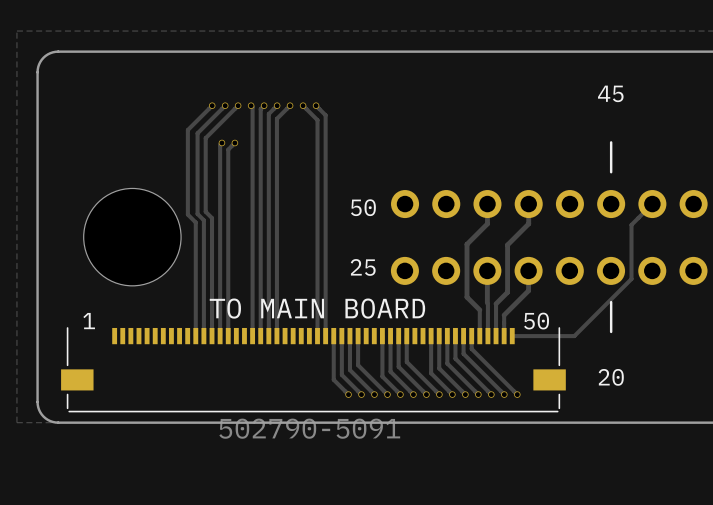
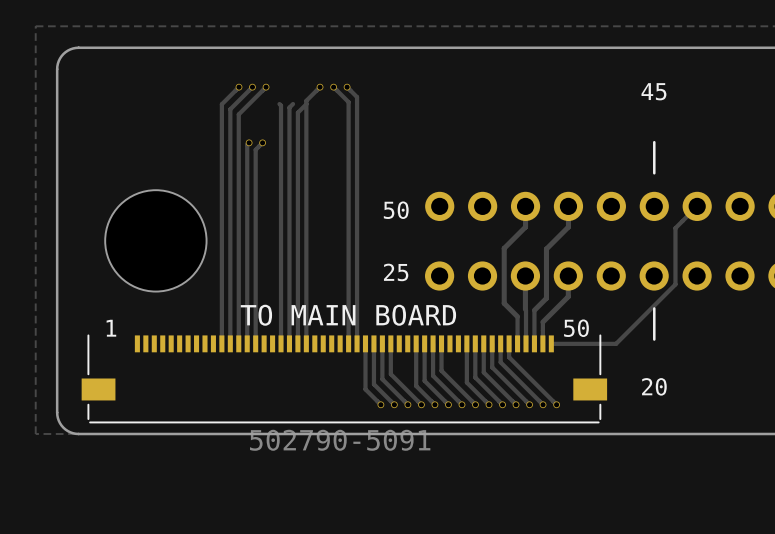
via: none -> (239, 87)
via: none -> (252, 87)
via: none -> (266, 87)
via: none -> (320, 87)
via: none -> (333, 87)
via: none -> (347, 87)
track: (212, 105) (187, 130) (187, 214) (195, 222) -> (239, 87) (221, 104) (221, 225)
via: (212, 105) -> none
track: (225, 105) (197, 133) (197, 213) (203, 220) -> (252, 87) (230, 109) (230, 223)
via: (225, 105) -> none
track: (238, 105) (205, 138) (205, 211) (212, 218) -> (266, 87) (238, 114) (238, 221)
via: (238, 105) -> none
via: (251, 105) -> none
via: (264, 105) -> none
via: (277, 105) -> none
track: (290, 105) (276, 118) -> (320, 87) (306, 100) (306, 117)
via: (290, 105) -> none
track: (303, 105) (317, 120) -> (333, 87) (348, 102) (348, 119)
via: (303, 105) -> none
track: (316, 105) (325, 115) -> (347, 87) (357, 97) (357, 113)
via: (316, 105) -> none

